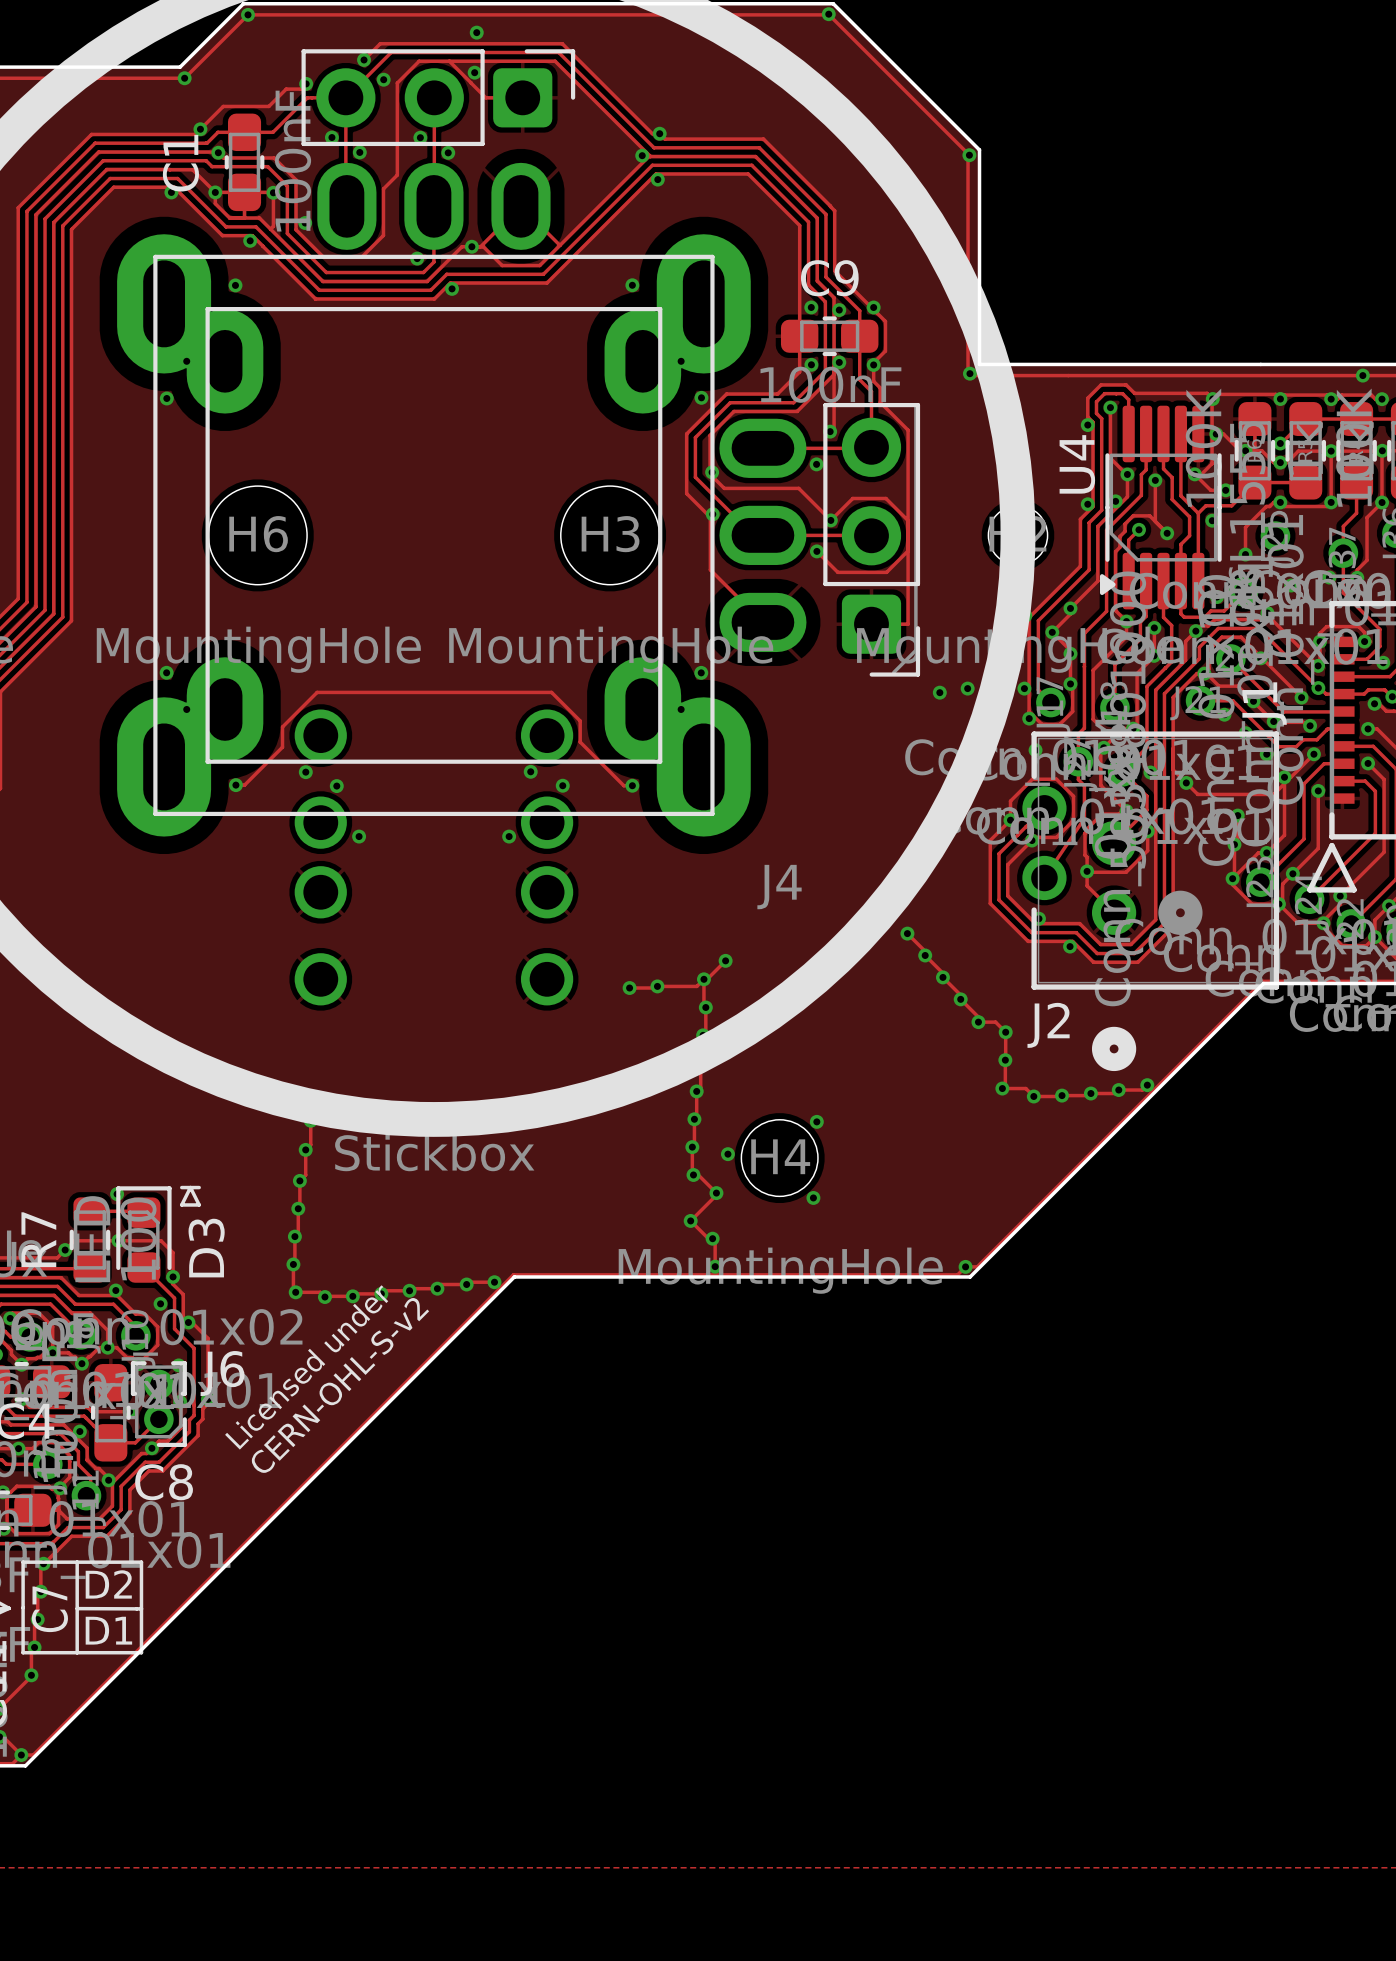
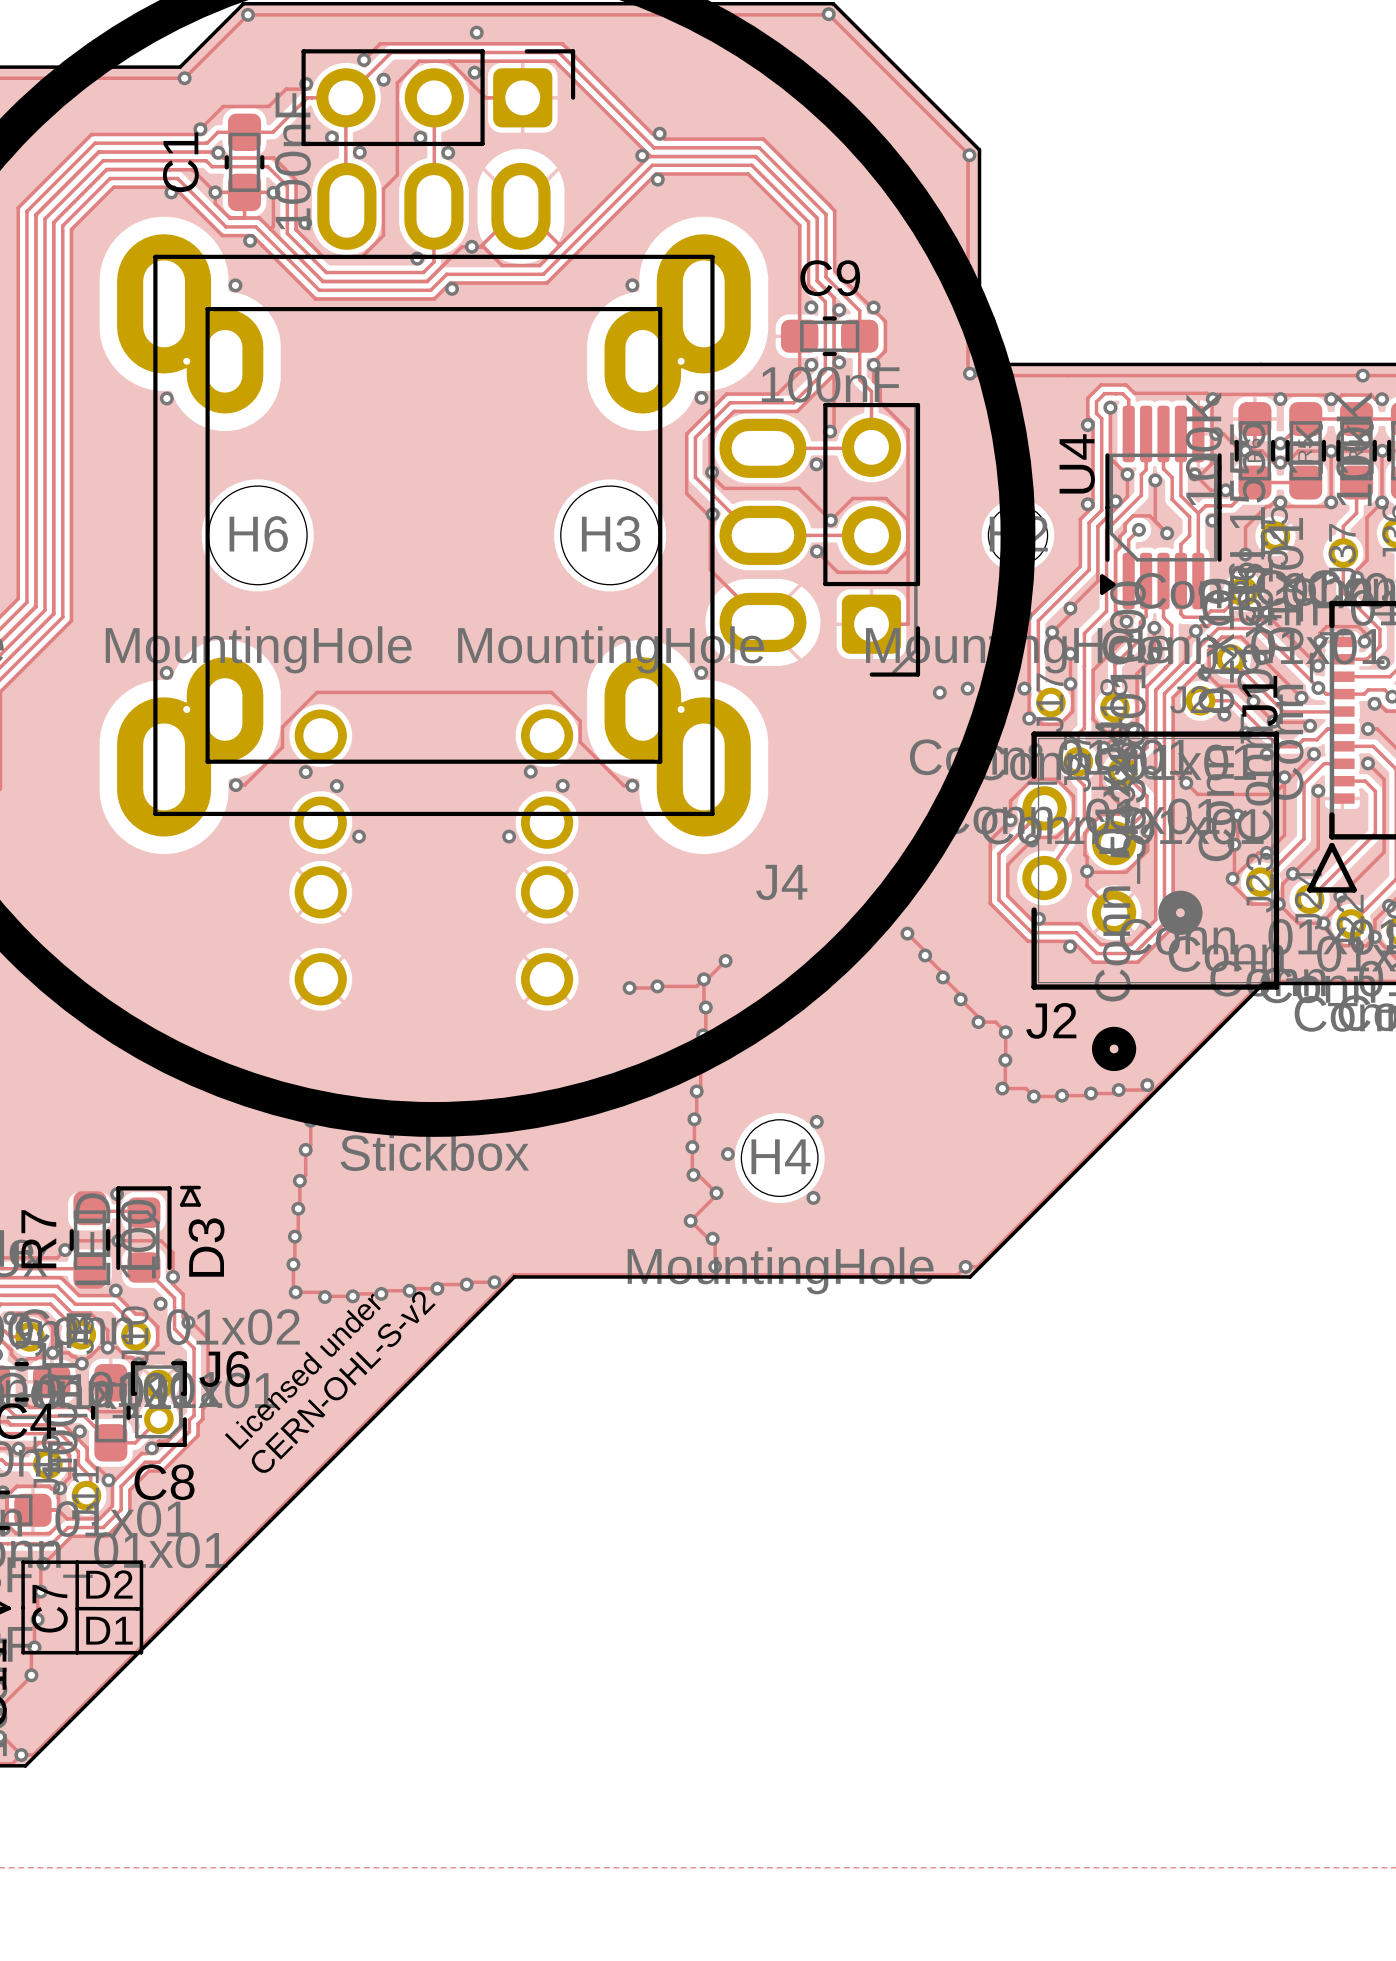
R7 footprint: [69, 1197, 111, 1283] -> [69, 1191, 111, 1289]

